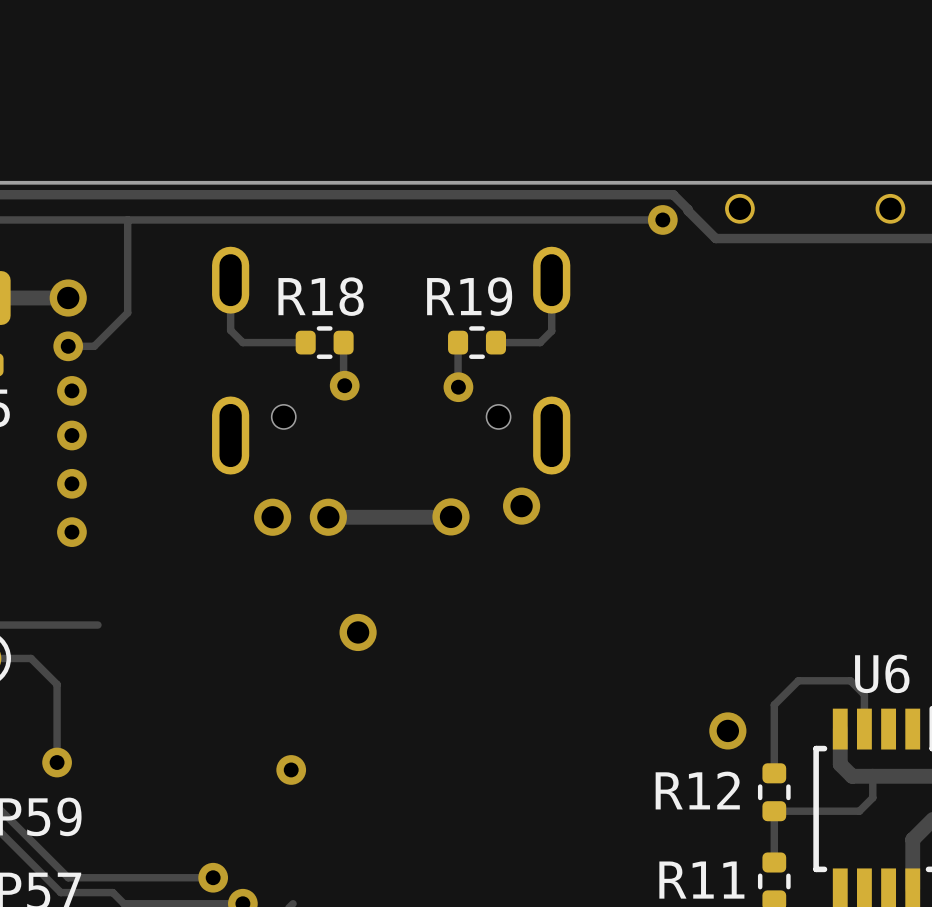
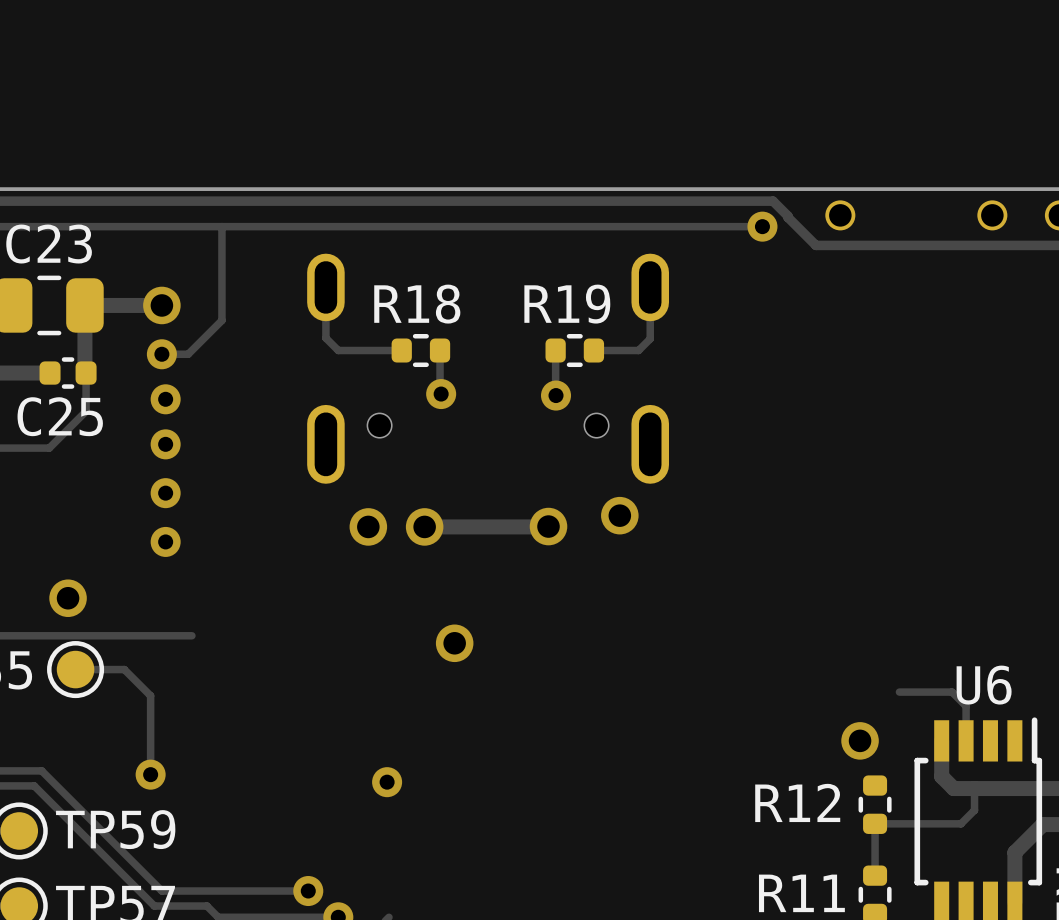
track: (798, 680) (774, 704) (774, 773) -> none
via position: (727, 730) -> (860, 740)

